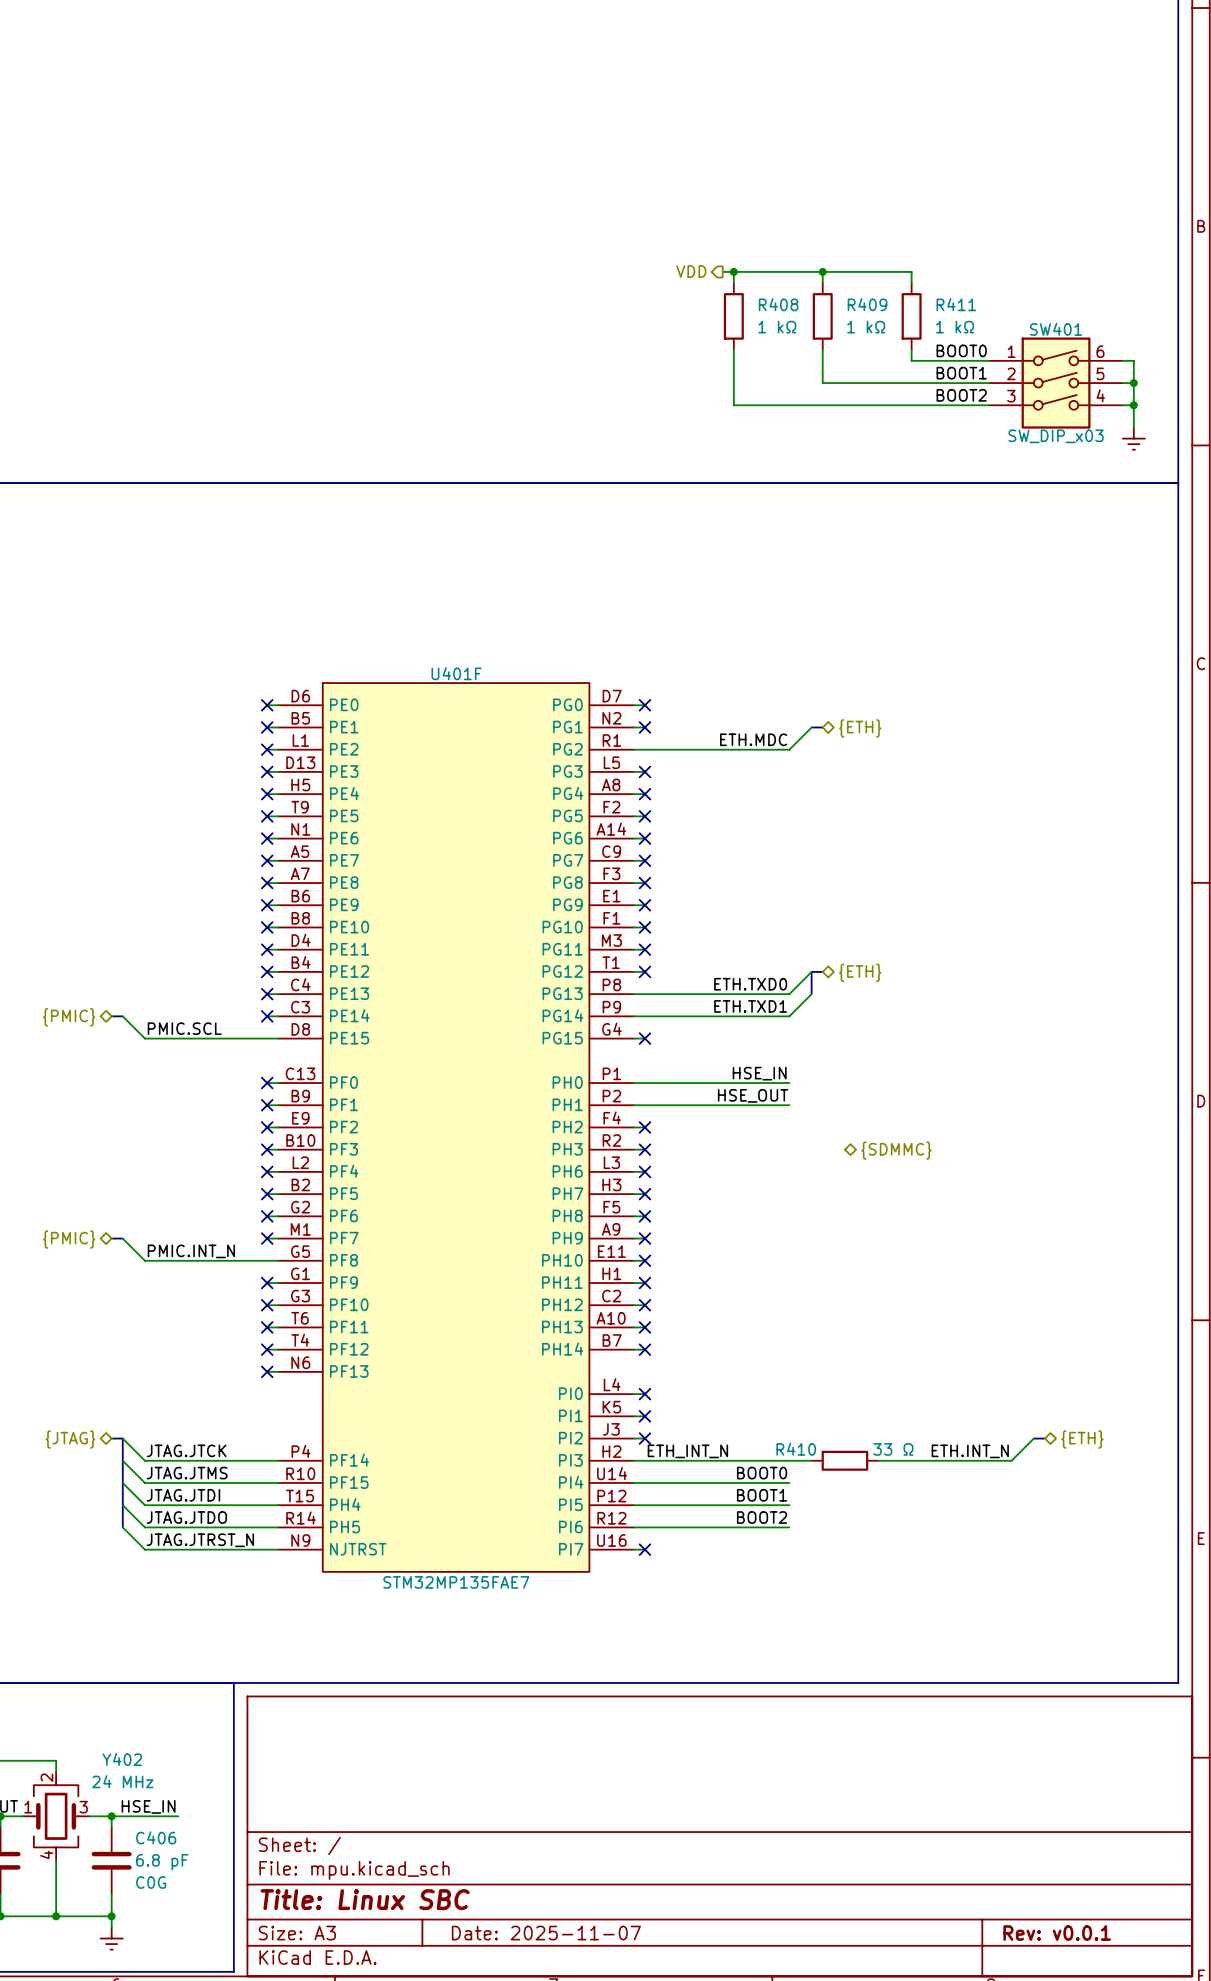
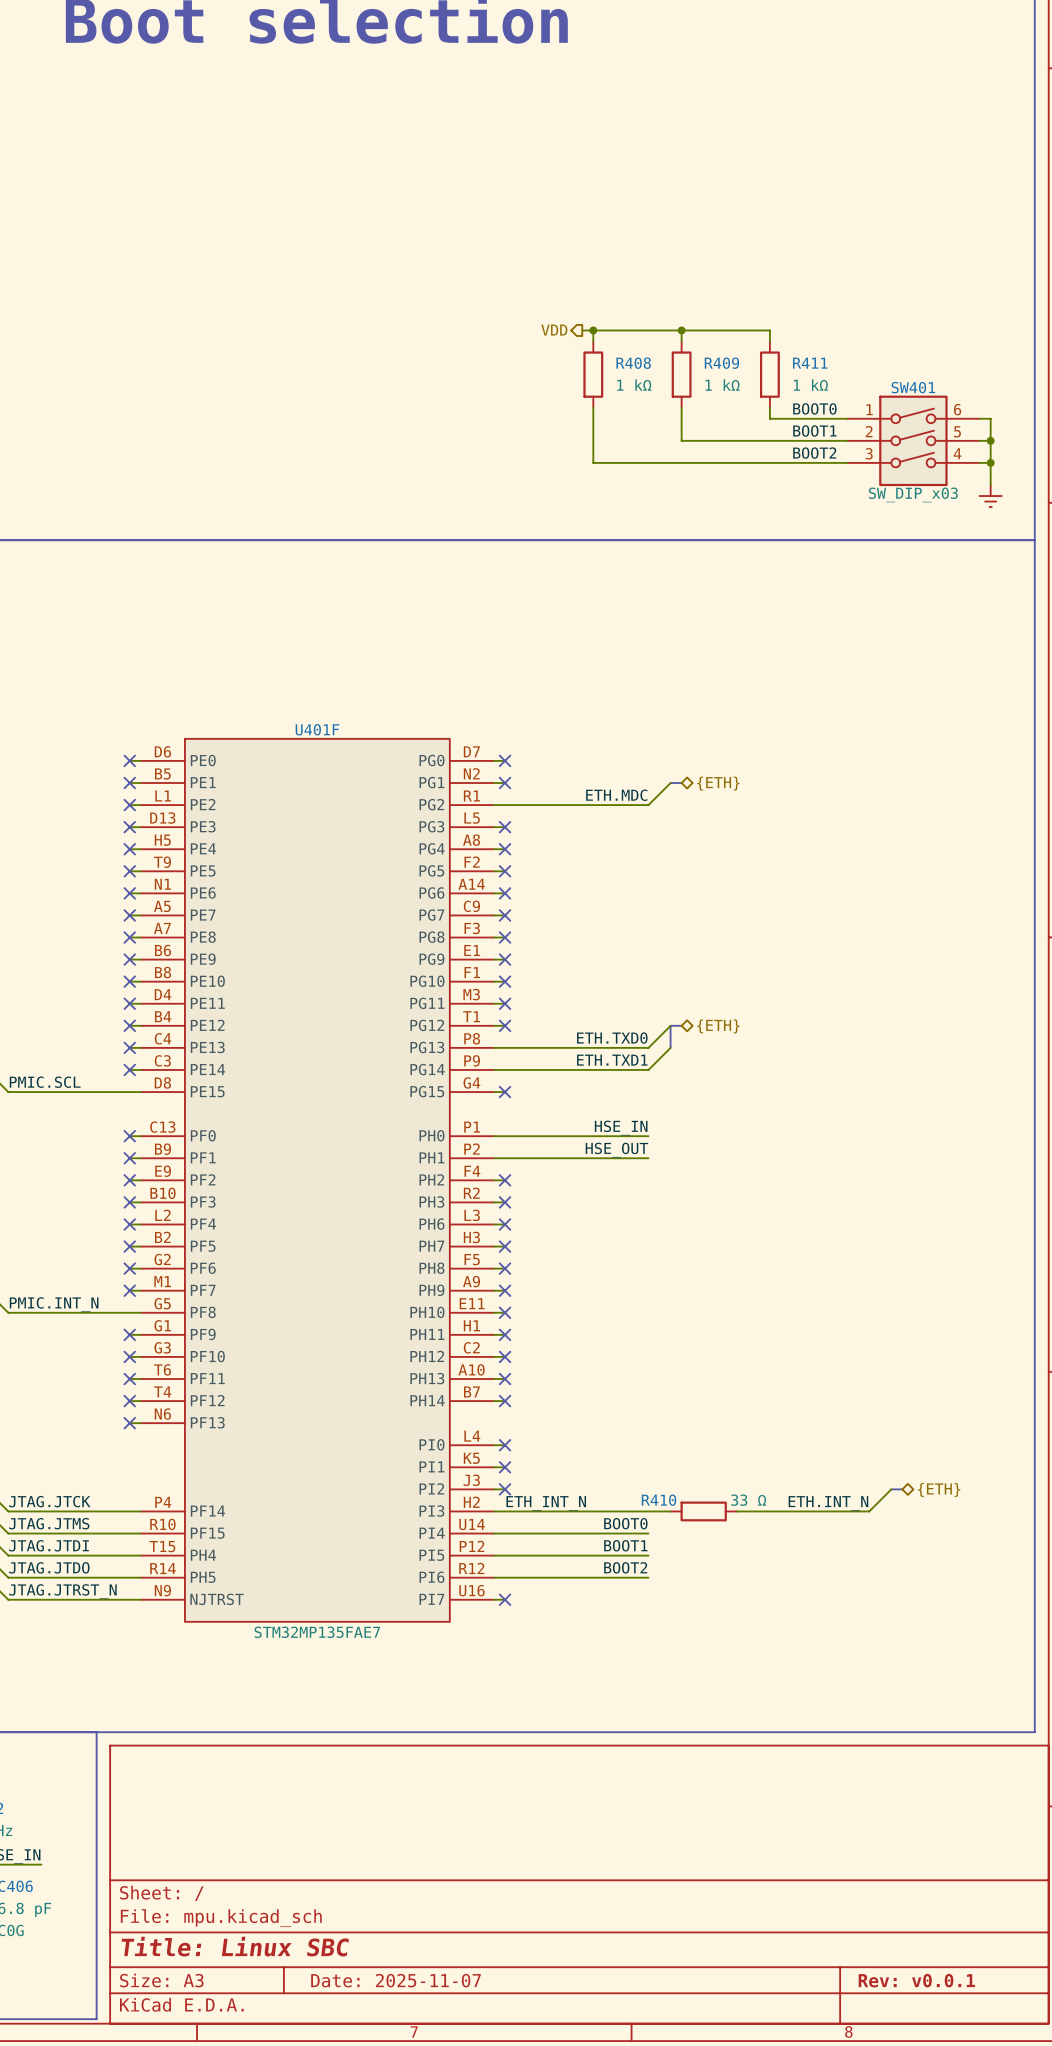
hierarchical label: {SDMMC} (896, 1150) -> none

